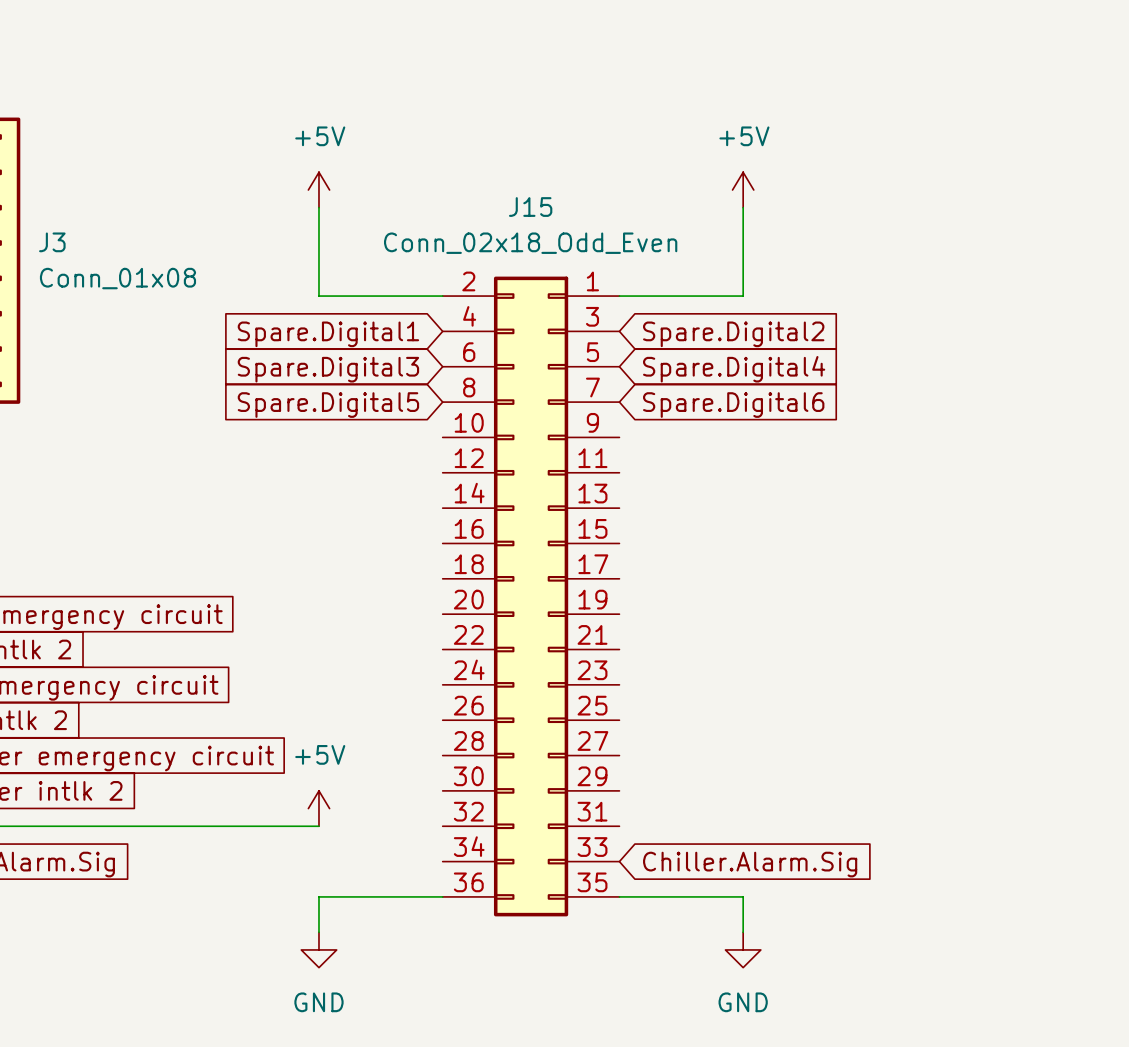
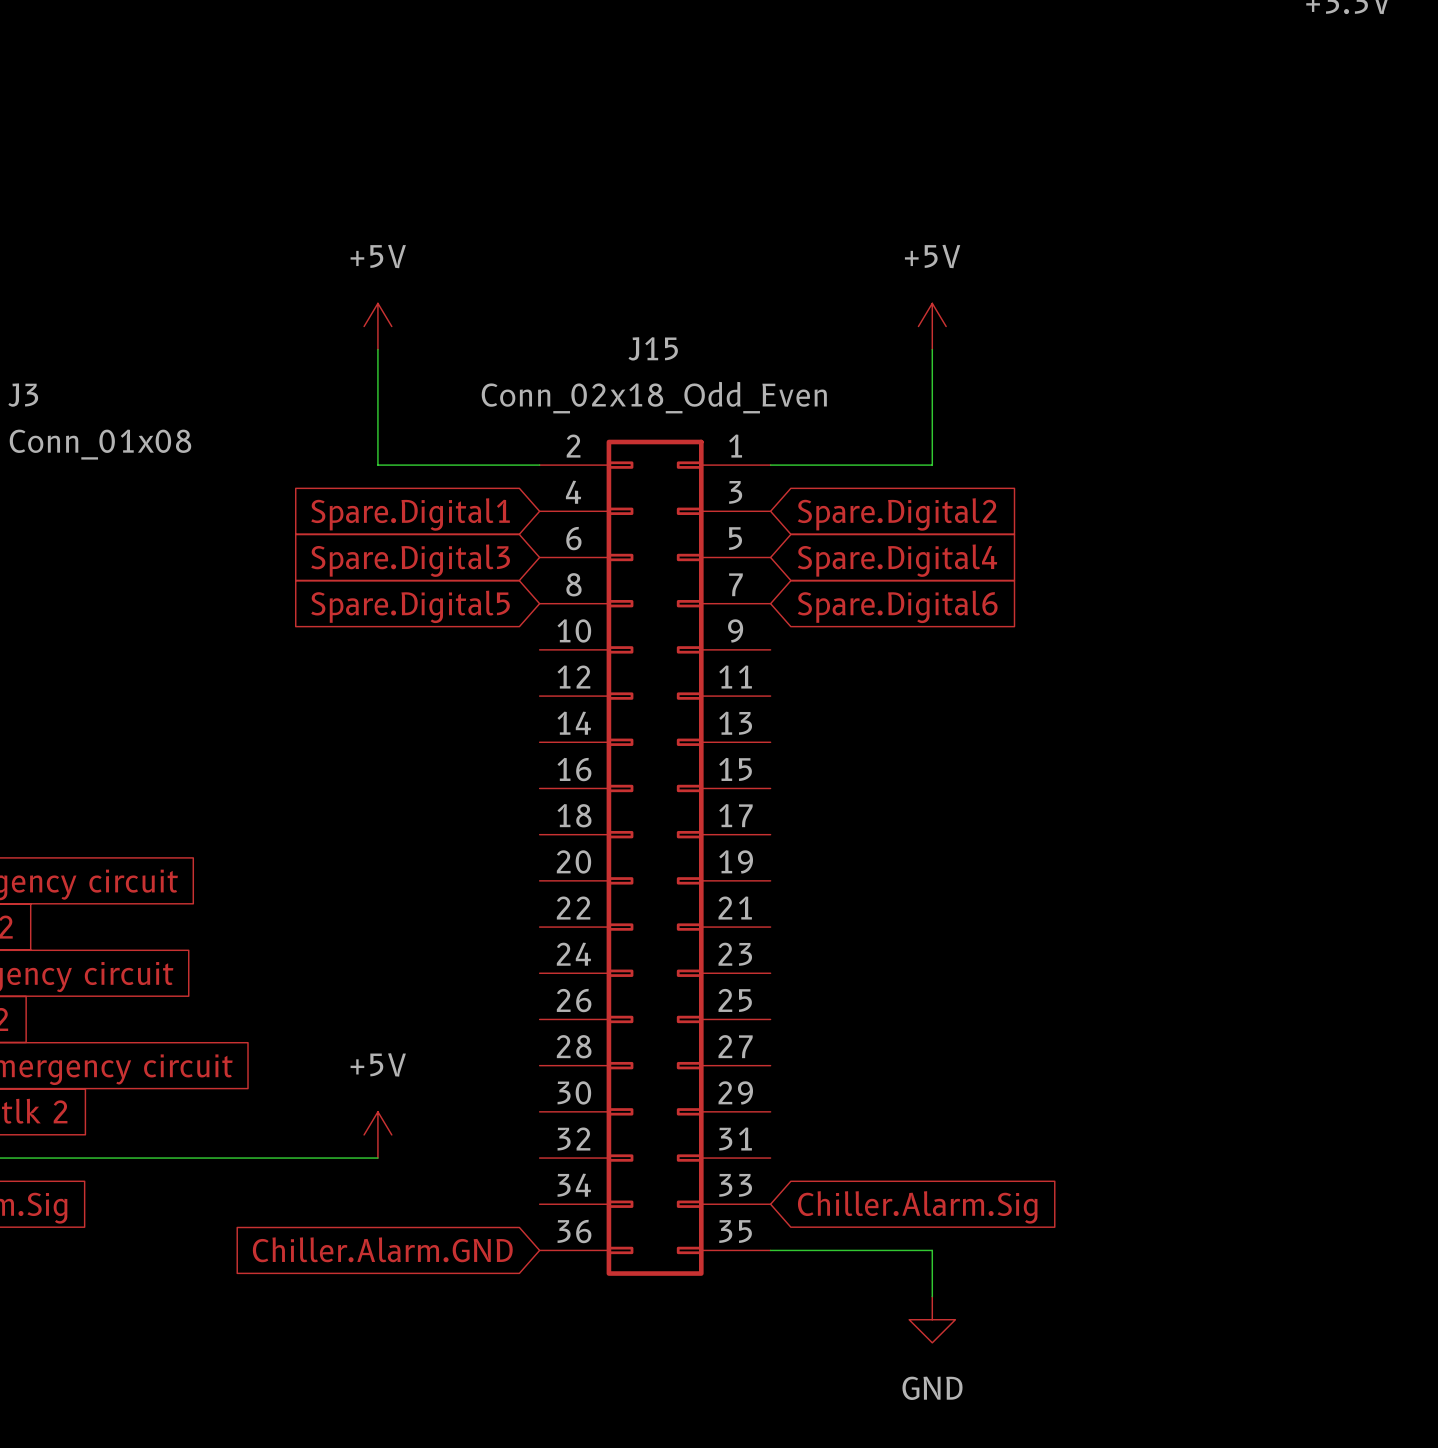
global label: none -> Chiller.Alarm.GND (382, 1249)
wire: (442, 896) (318, 896) (318, 932) -> none
power symbol: GND (318, 949) -> none

